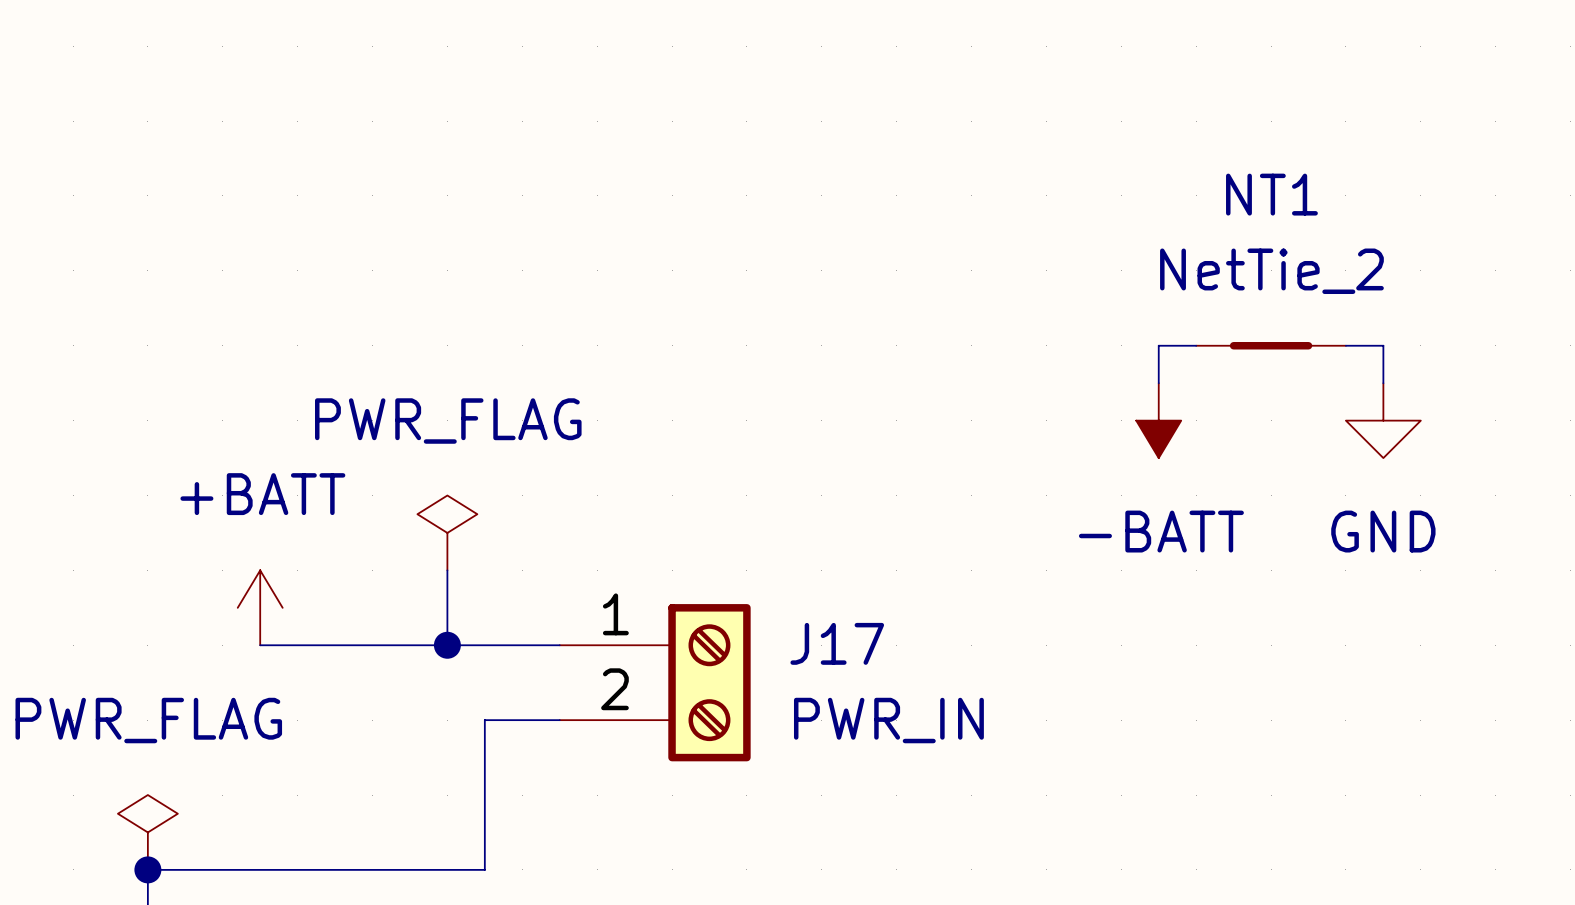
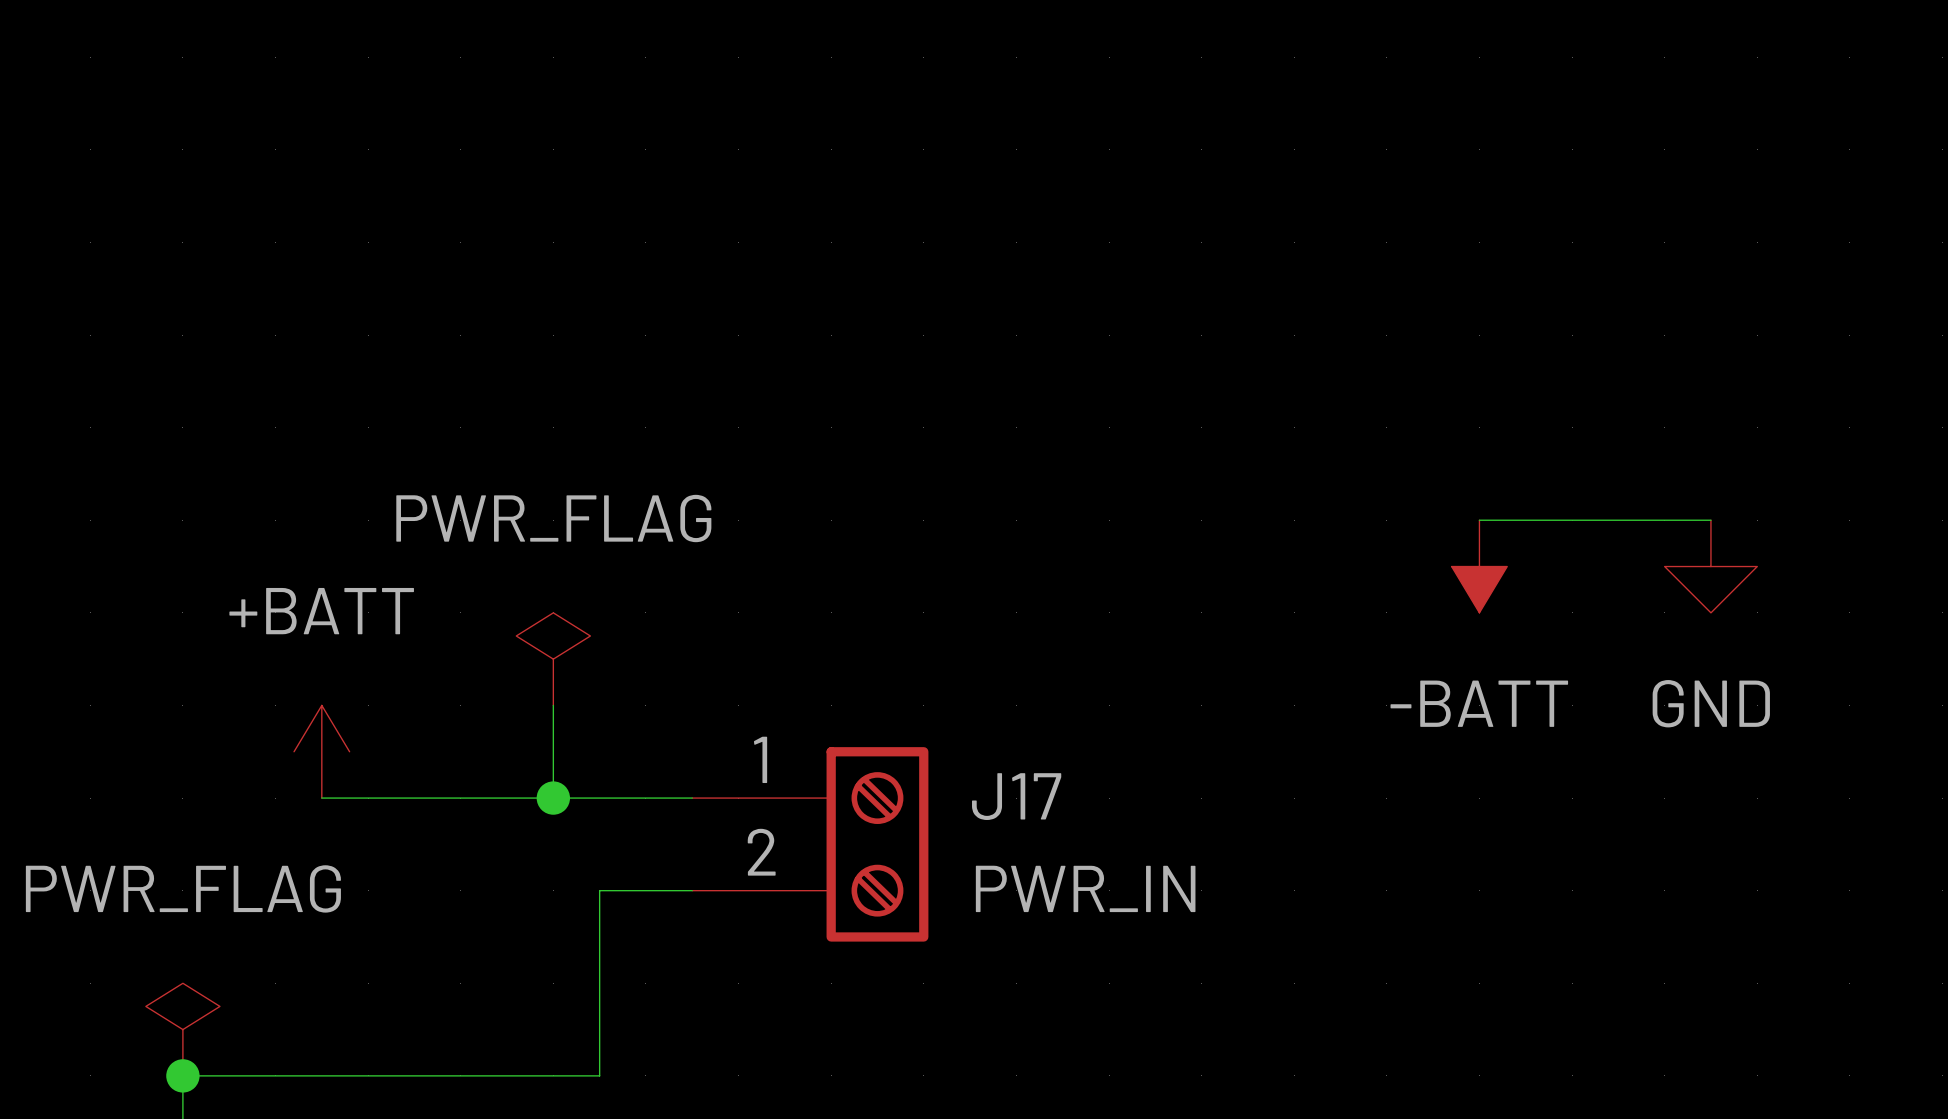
wire: (1196, 345) (1158, 345) (1158, 383) -> none
NT1: NetTie_2 (1271, 345) -> none
wire: (1345, 345) (1383, 345) (1383, 383) -> none
power symbol position: -BATT (1158, 420) -> -BATT (1479, 566)
wire: none -> (1479, 520) (1710, 520)
power symbol position: GND (1383, 420) -> GND (1710, 566)

